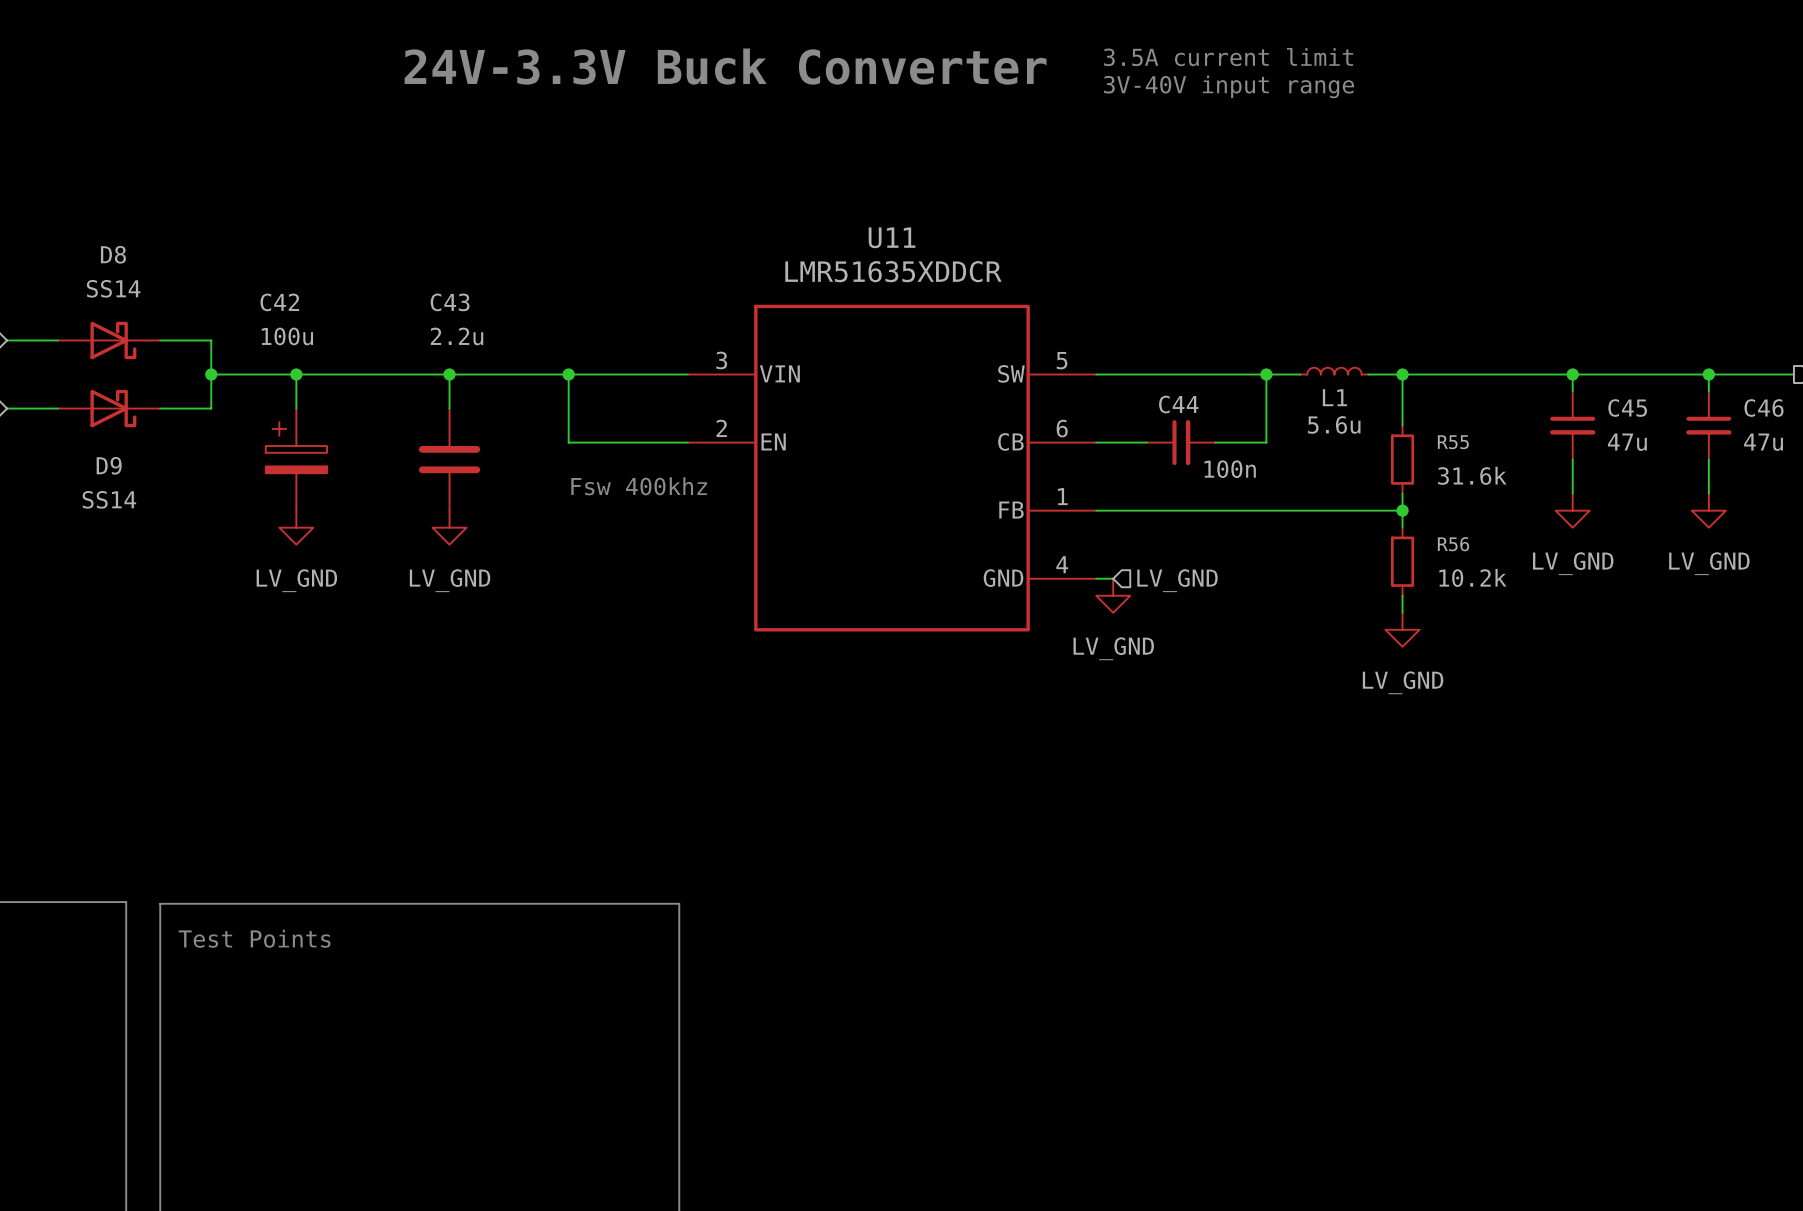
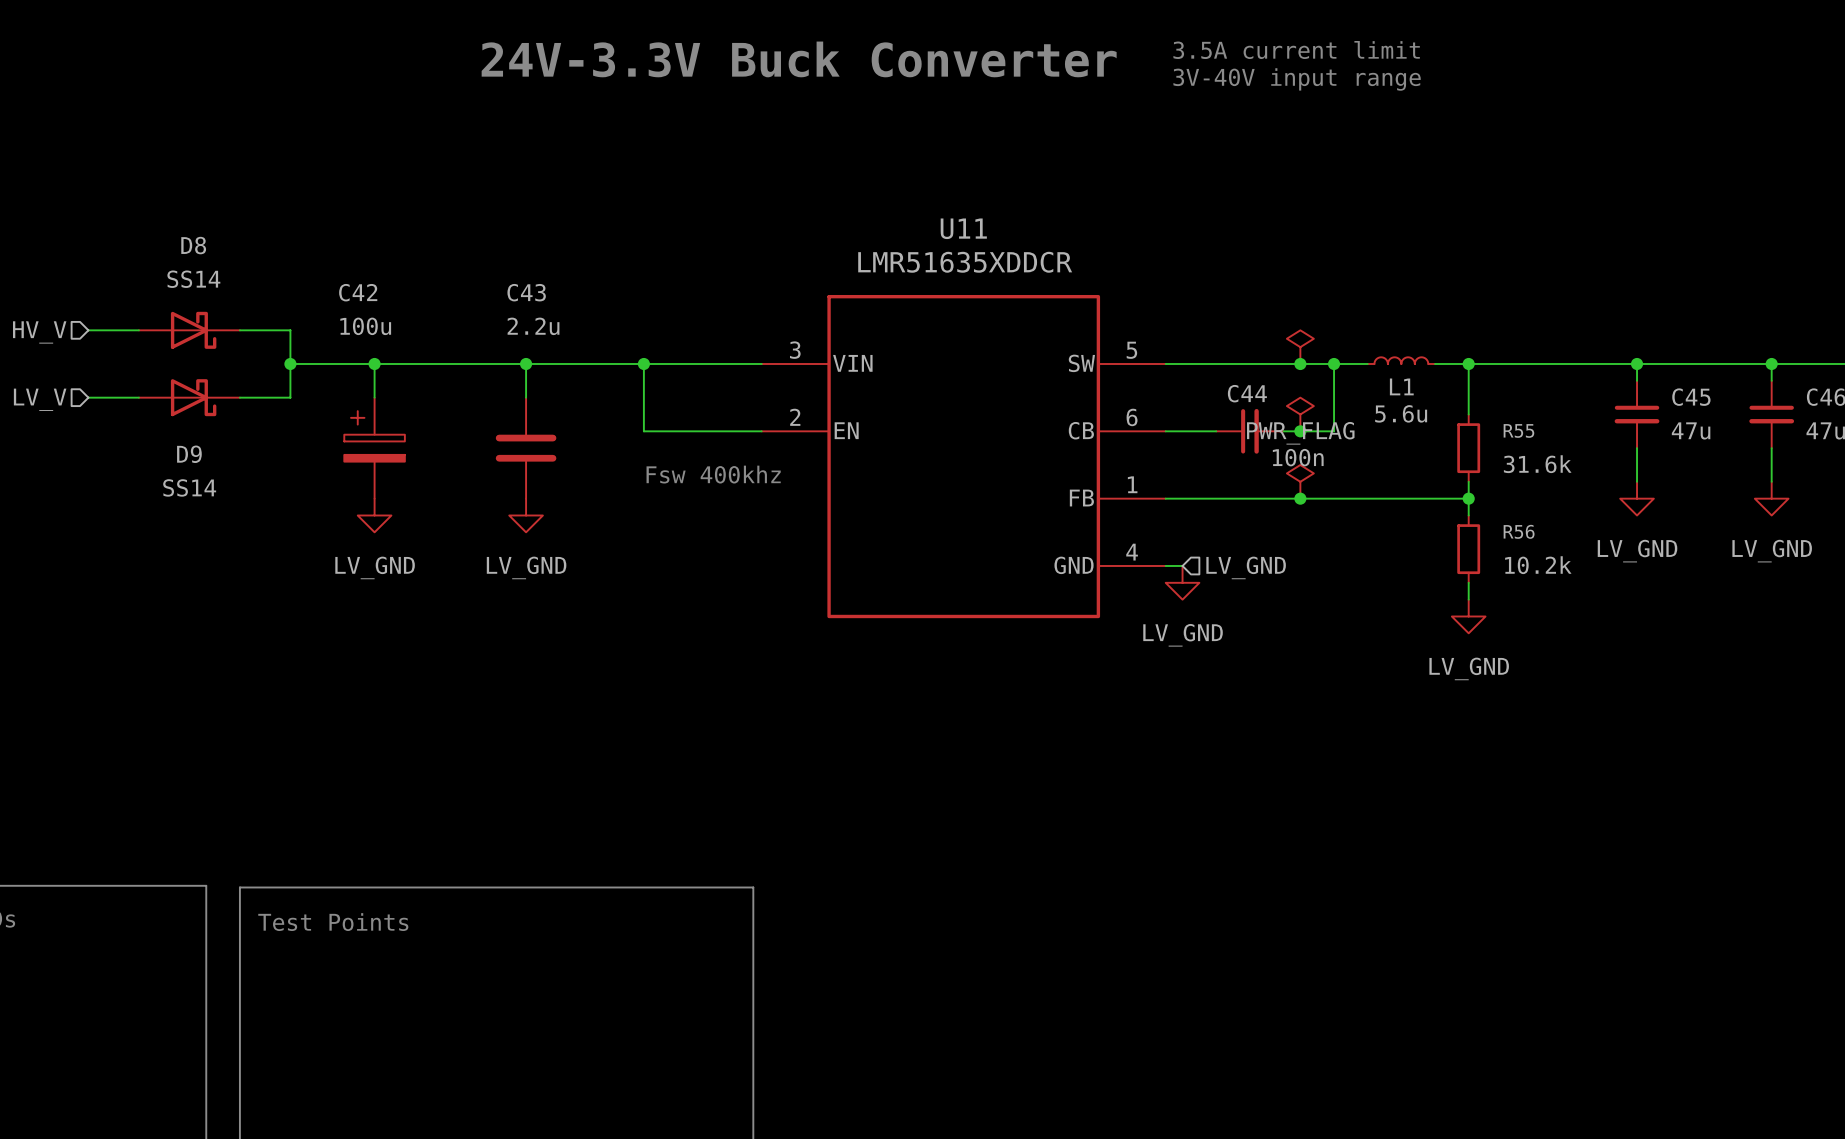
power symbol: none -> (1300, 347)
junction: none -> (1300, 364)
power symbol: none -> (1300, 414)
junction: none -> (1300, 431)
power symbol: none -> PWR_FLAG (1300, 481)
junction: none -> (1300, 498)

